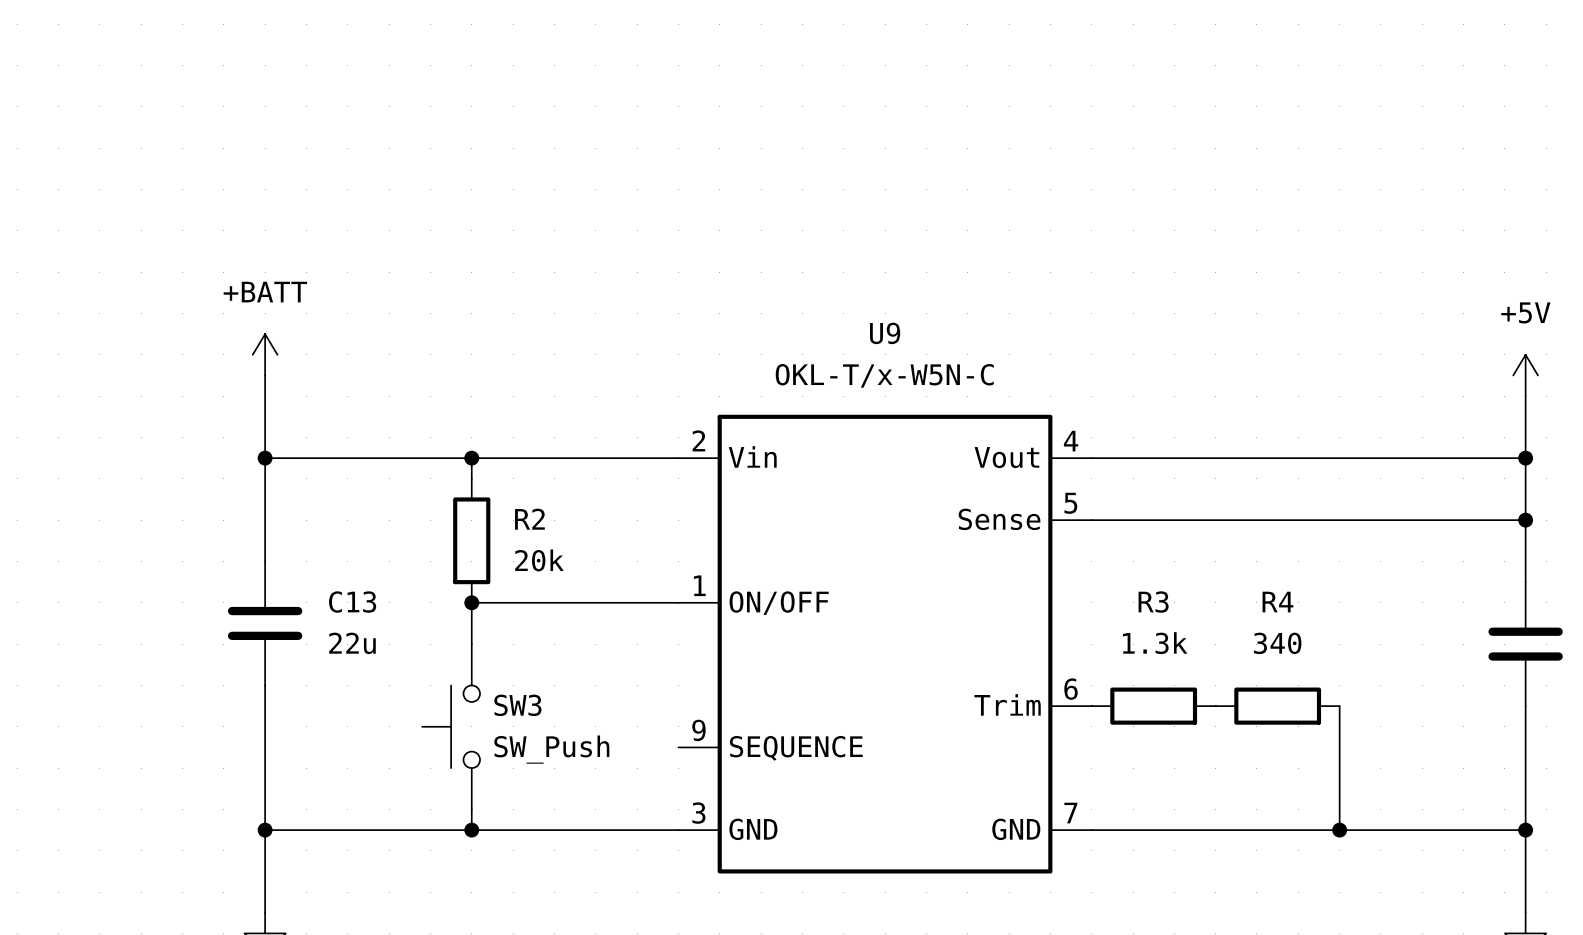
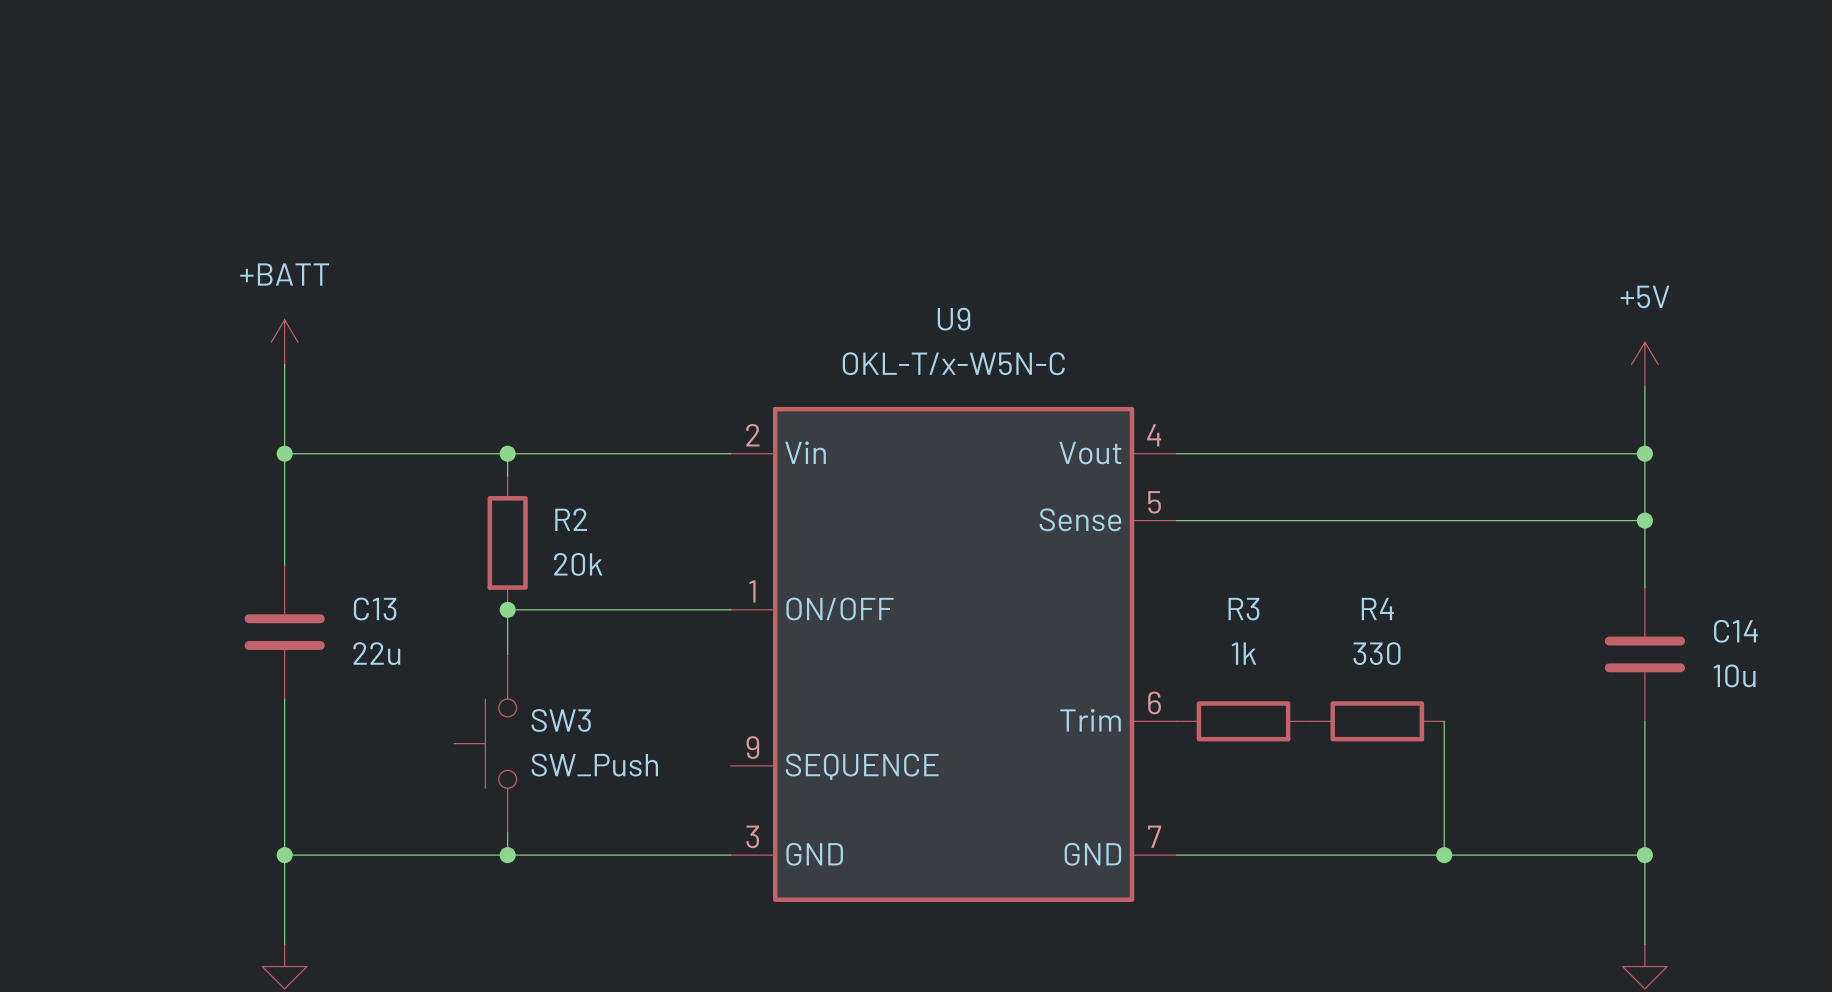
R3 value: 1.3k (1155, 643) -> 1k (1243, 653)
R4 value: 340 (1277, 643) -> 330 (1376, 653)

